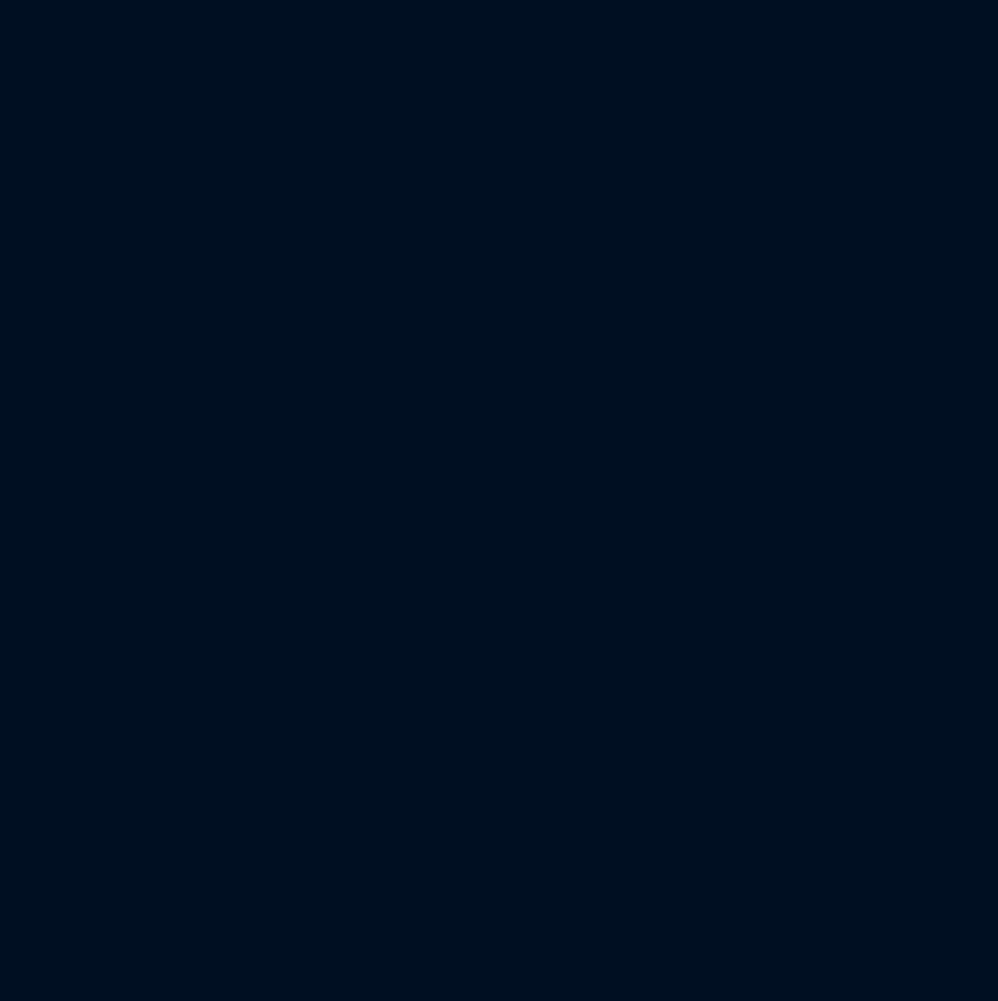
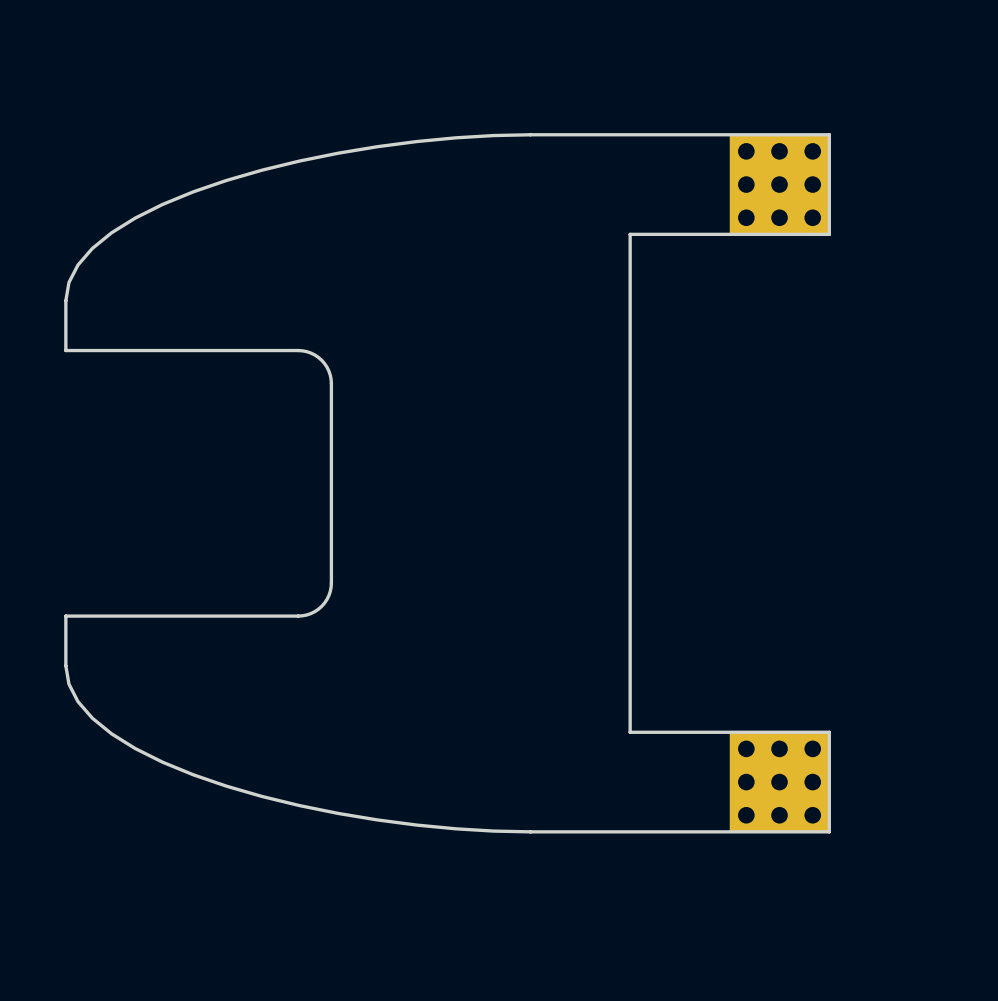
board edge: none -> (829, 134) (829, 234) (630, 234) (630, 732) (829, 732) (829, 831) (493, 831) (416, 825) (338, 813) (262, 796) (226, 786) (162, 762) (111, 733) (92, 718) (77, 701) (68, 684) (65, 665) (65, 616) (302, 615) (314, 611) (321, 606) (326, 599) (331, 587) (331, 383) (326, 367) (314, 354) (298, 350) (65, 350) (65, 300) (68, 282) (77, 265) (92, 248) (111, 232) (162, 204) (226, 180) (299, 161) (377, 146) (493, 135) (829, 134)
part: none -> (779, 184)
part: none -> (779, 782)

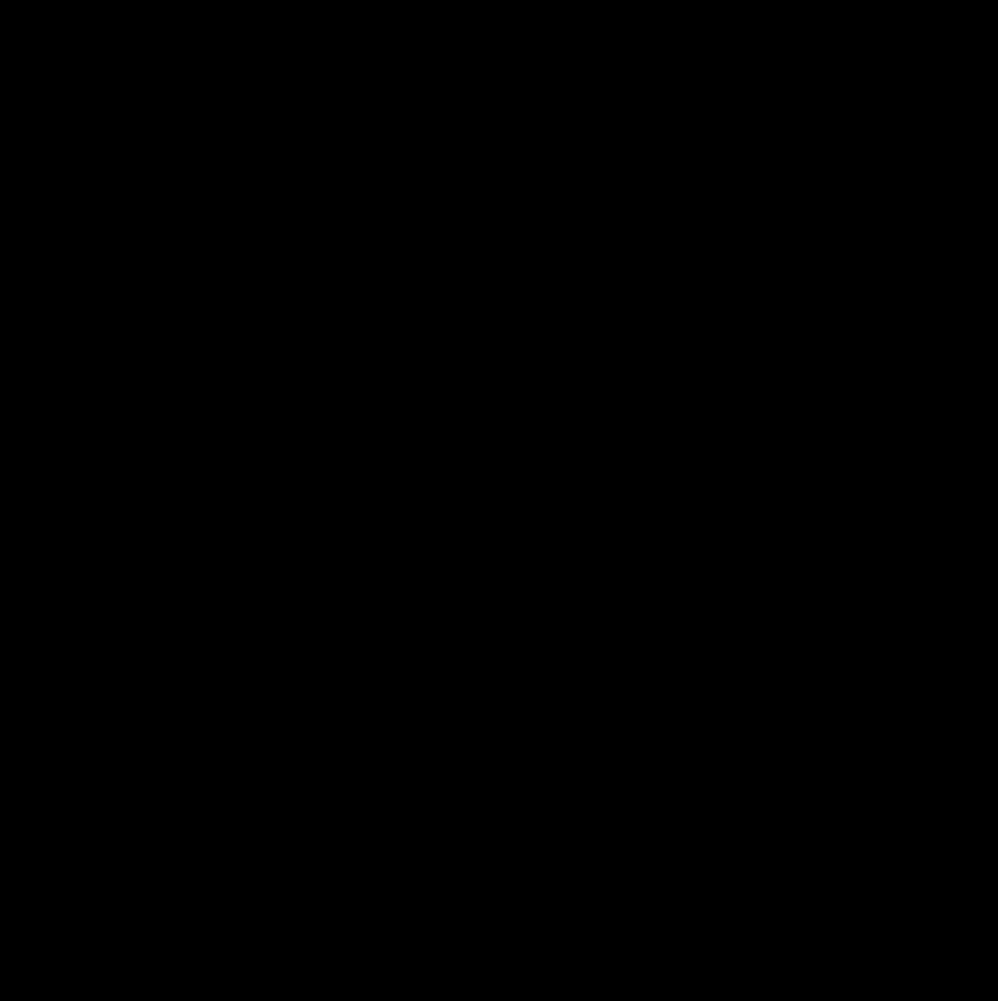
board edge: (829, 134) (829, 234) (630, 234) (630, 732) (829, 732) (829, 831) (493, 831) (416, 825) (338, 813) (262, 796) (226, 786) (162, 762) (111, 733) (92, 718) (77, 701) (68, 684) (65, 665) (65, 616) (302, 615) (314, 611) (321, 606) (326, 599) (331, 587) (331, 383) (326, 367) (314, 354) (298, 350) (65, 350) (65, 300) (68, 282) (77, 265) (92, 248) (111, 232) (162, 204) (226, 180) (299, 161) (377, 146) (493, 135) (829, 134) -> none
part: (779, 184) -> none
part: (779, 782) -> none

